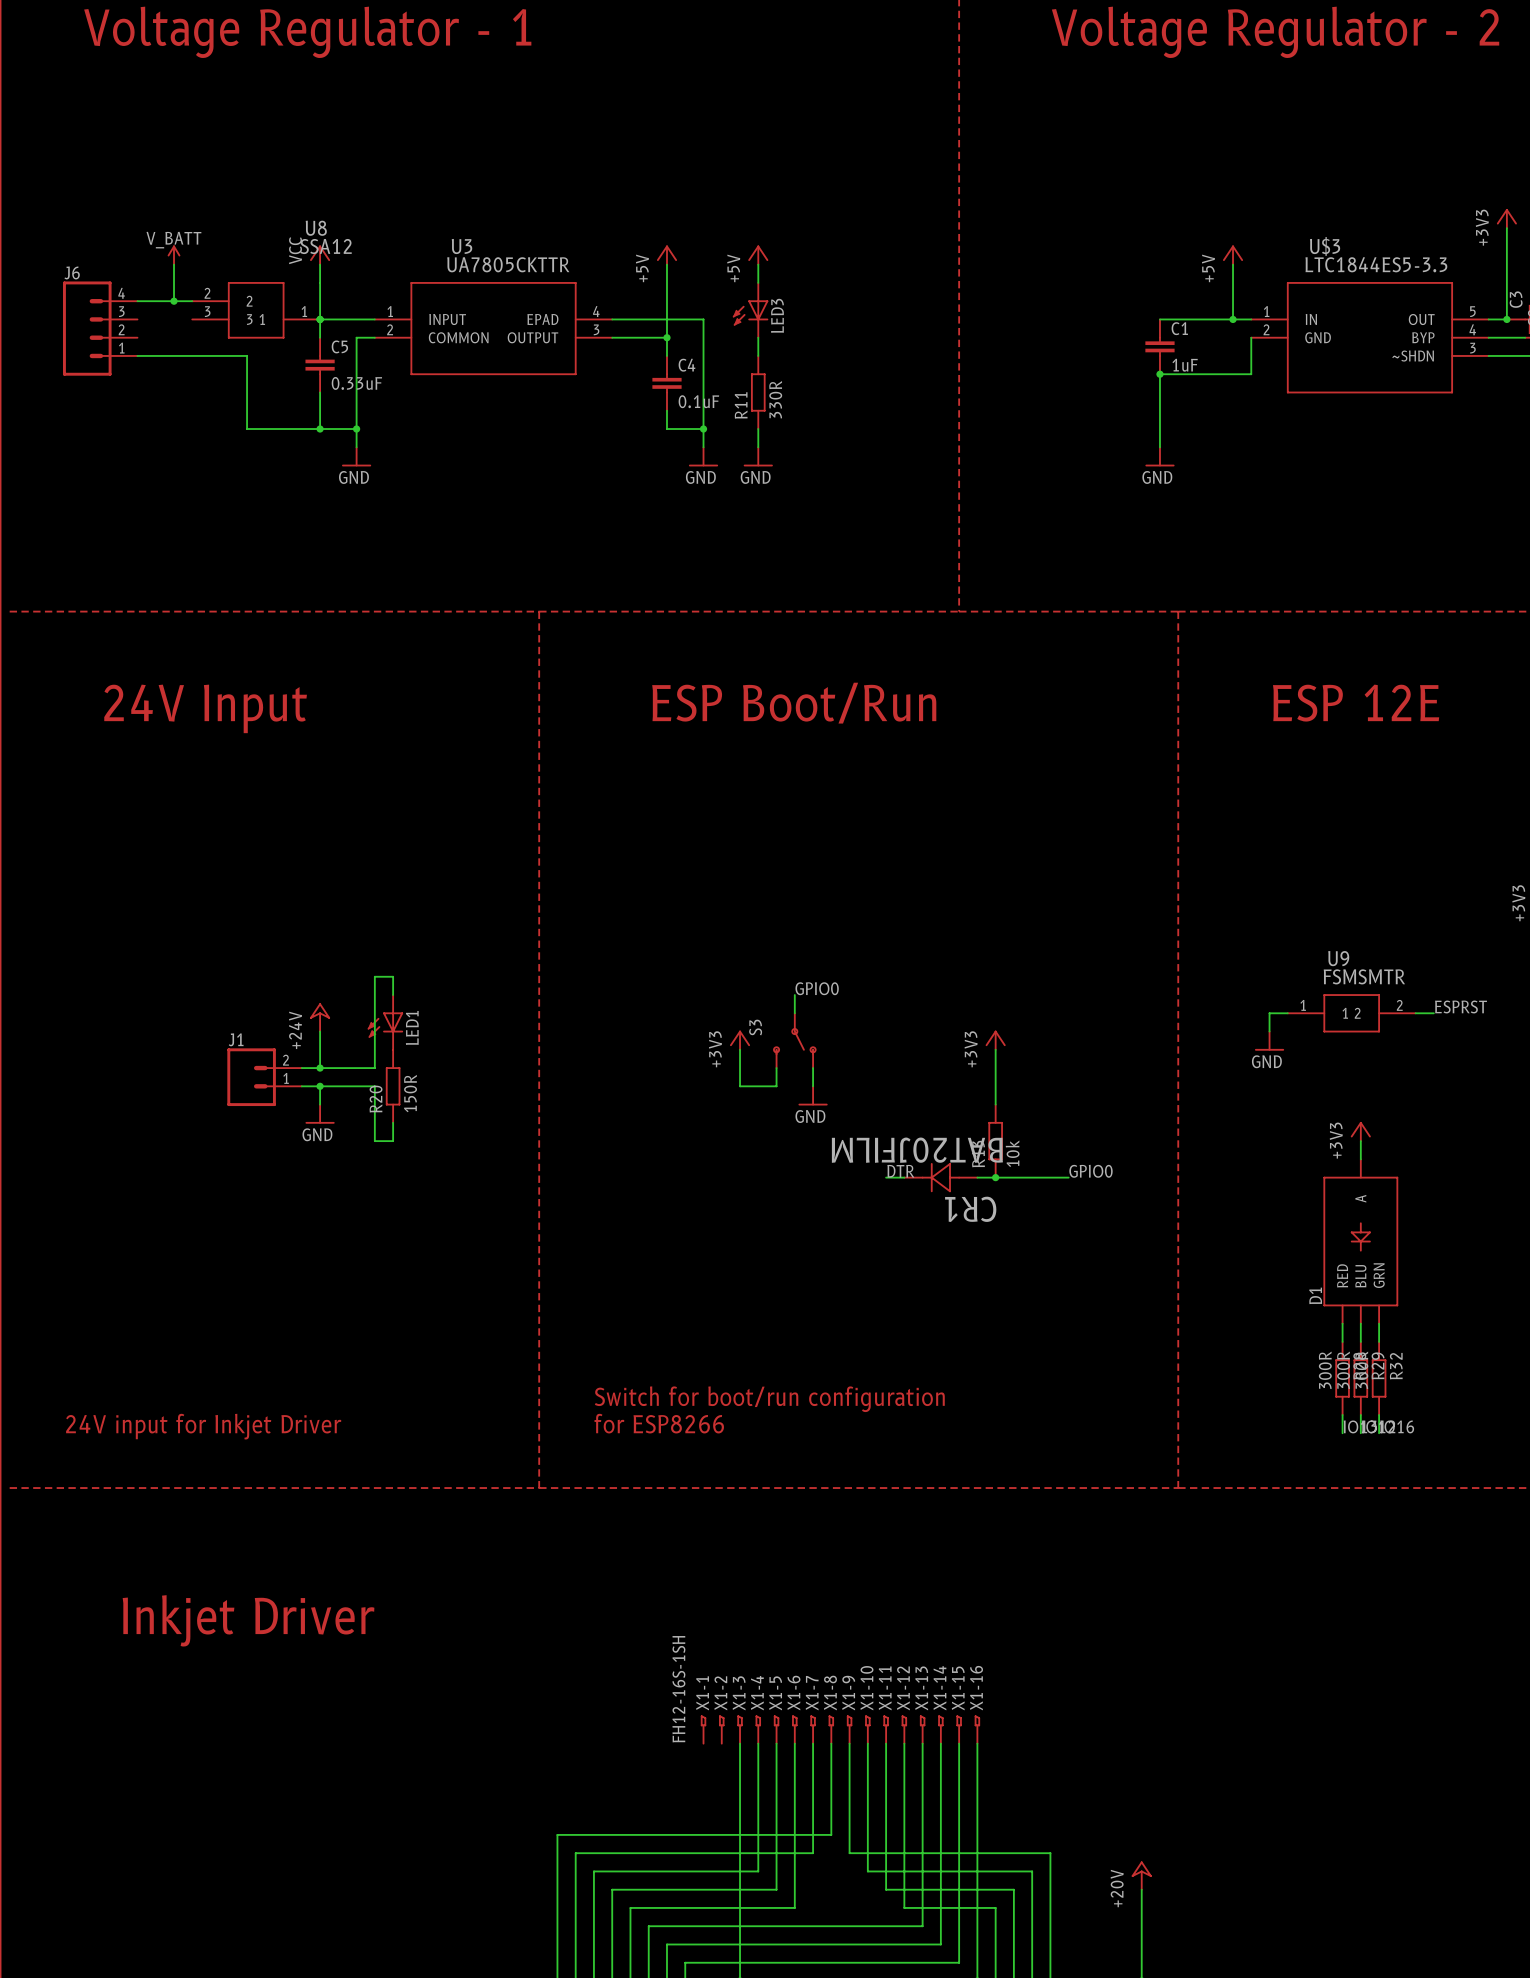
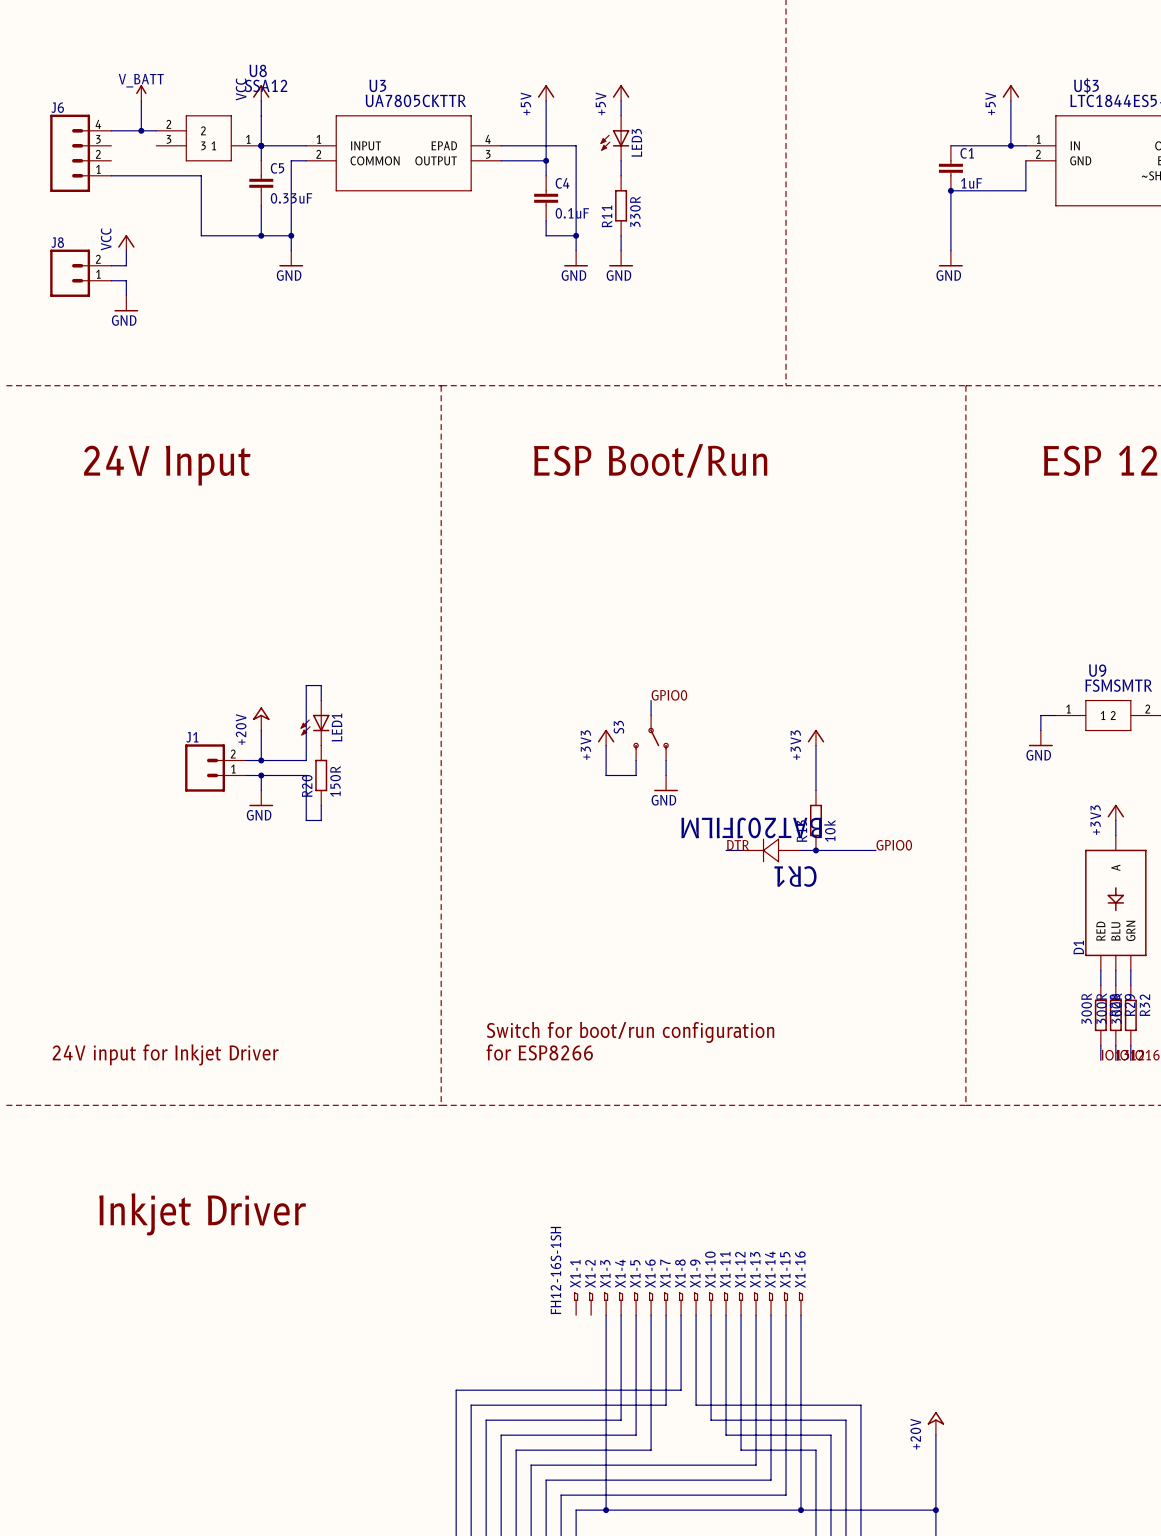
power symbol: none -> VCC (126, 242)
wire: none -> (126, 250) (126, 265) (111, 265)
J8: none -> (80, 273)
wire: none -> (111, 280) (126, 280) (126, 295)
power symbol: none -> GND (126, 303)
power symbol: +24V (320, 1017) -> +20V (261, 718)

